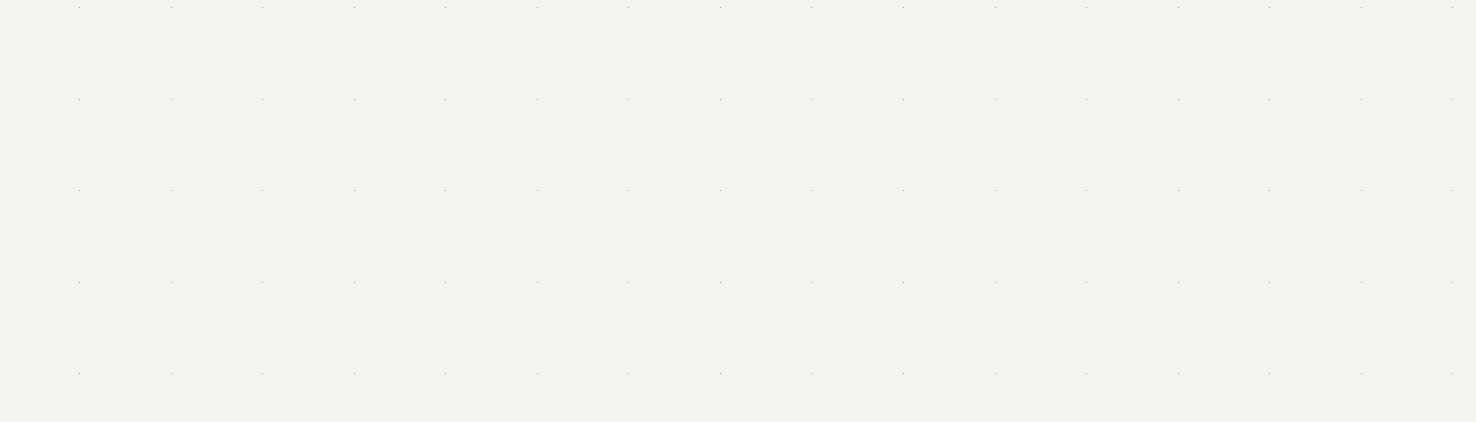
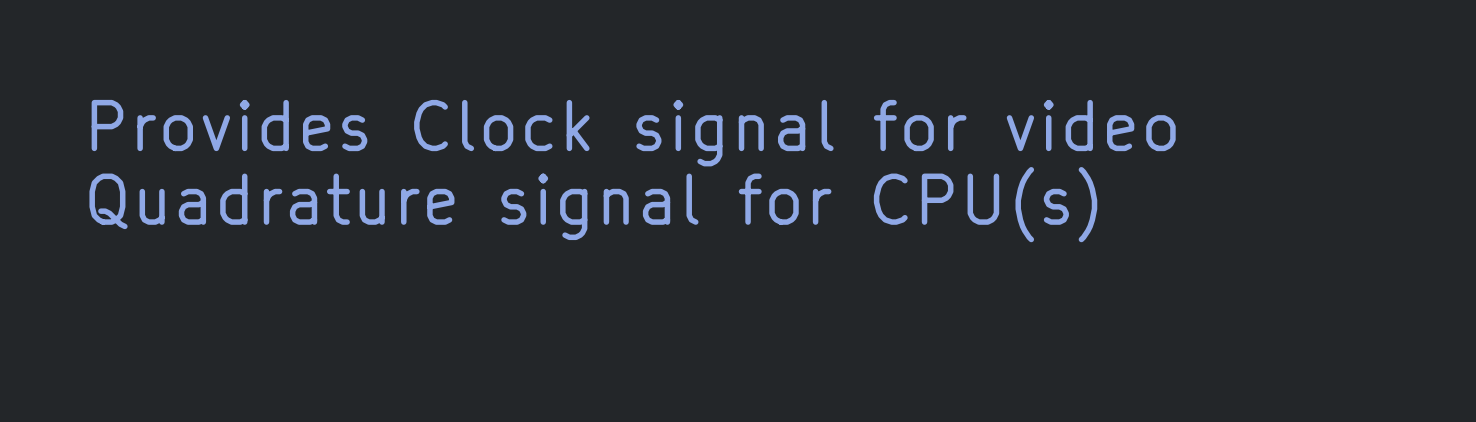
text: none -> Provides Clock signal for video (633, 133)
text: none -> Quadrature signal for CPU(s) (593, 204)

